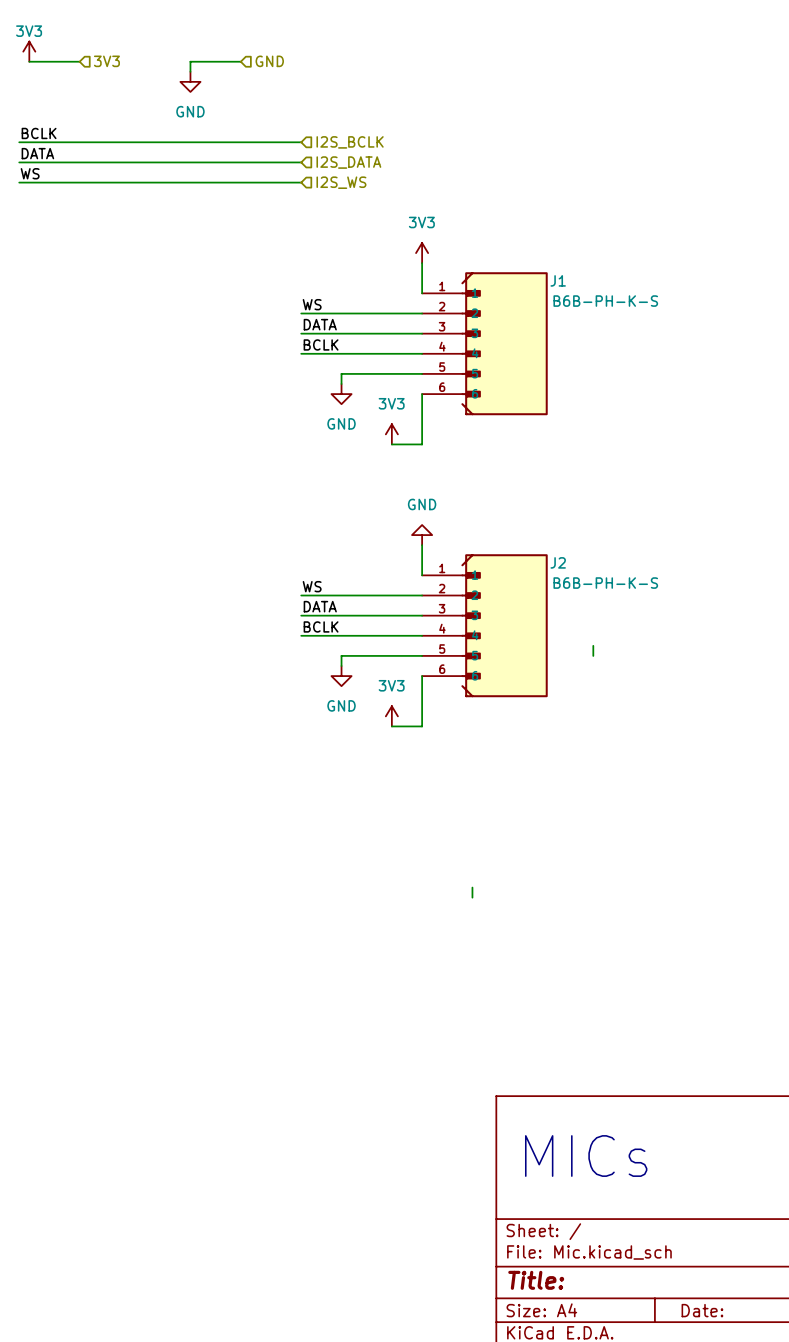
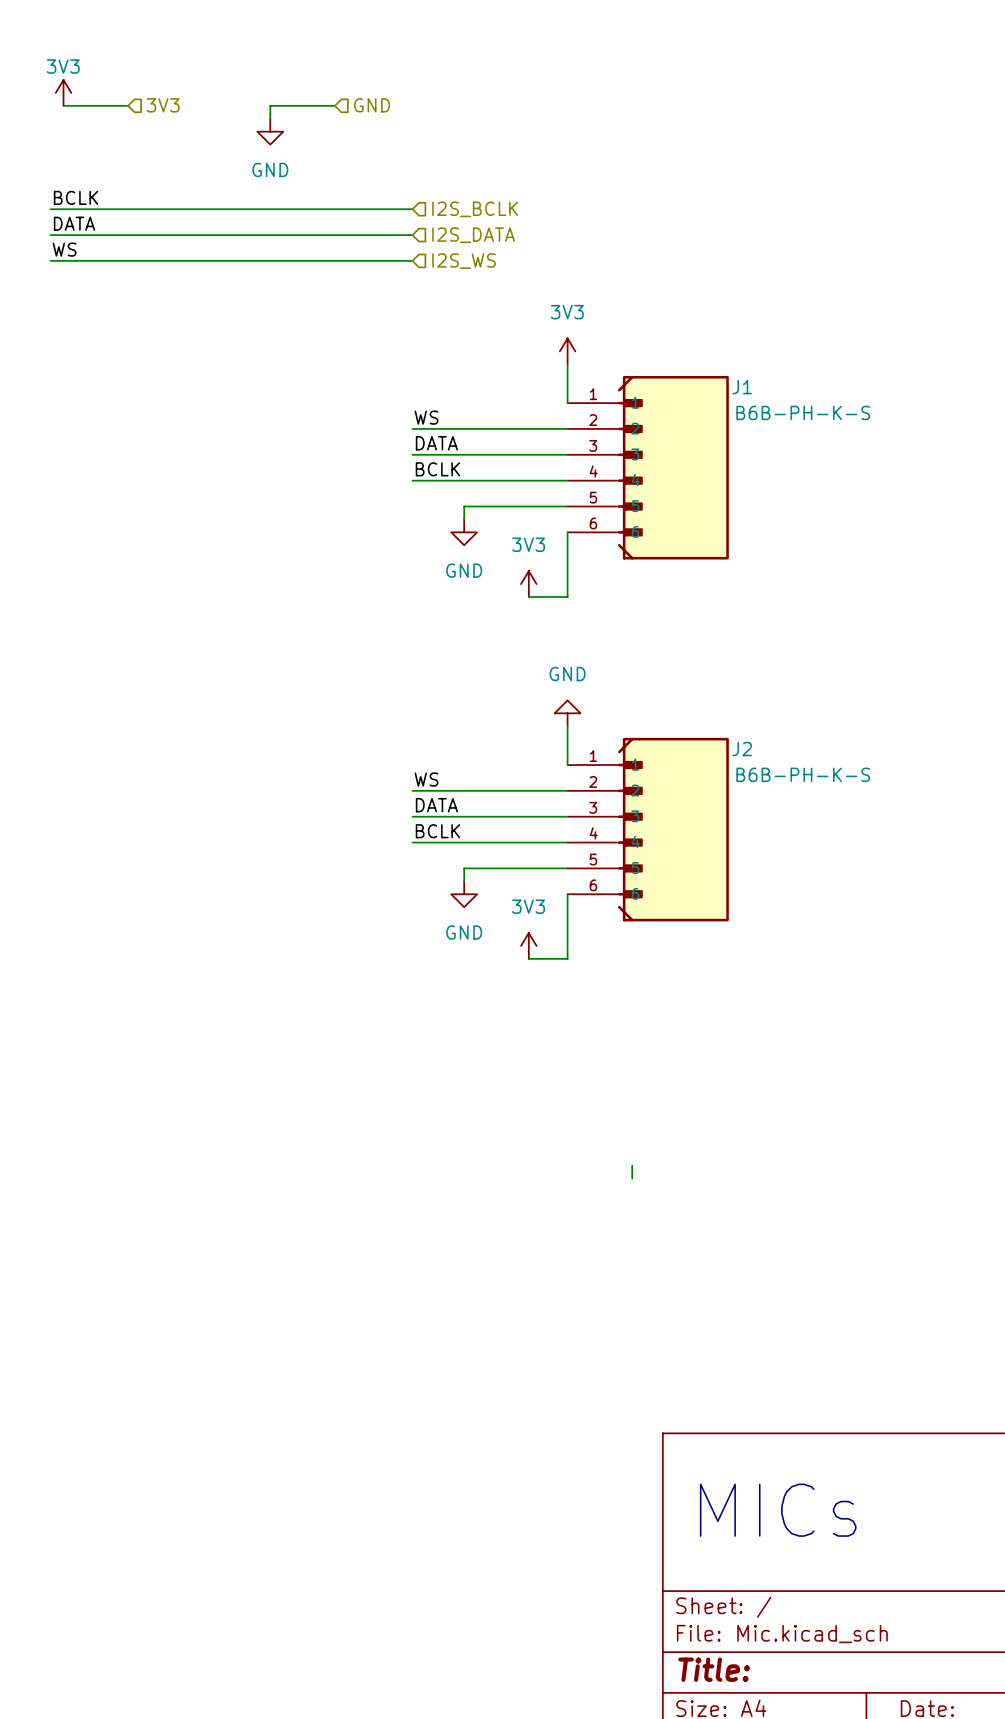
wire: (593, 645) (593, 655) -> none

